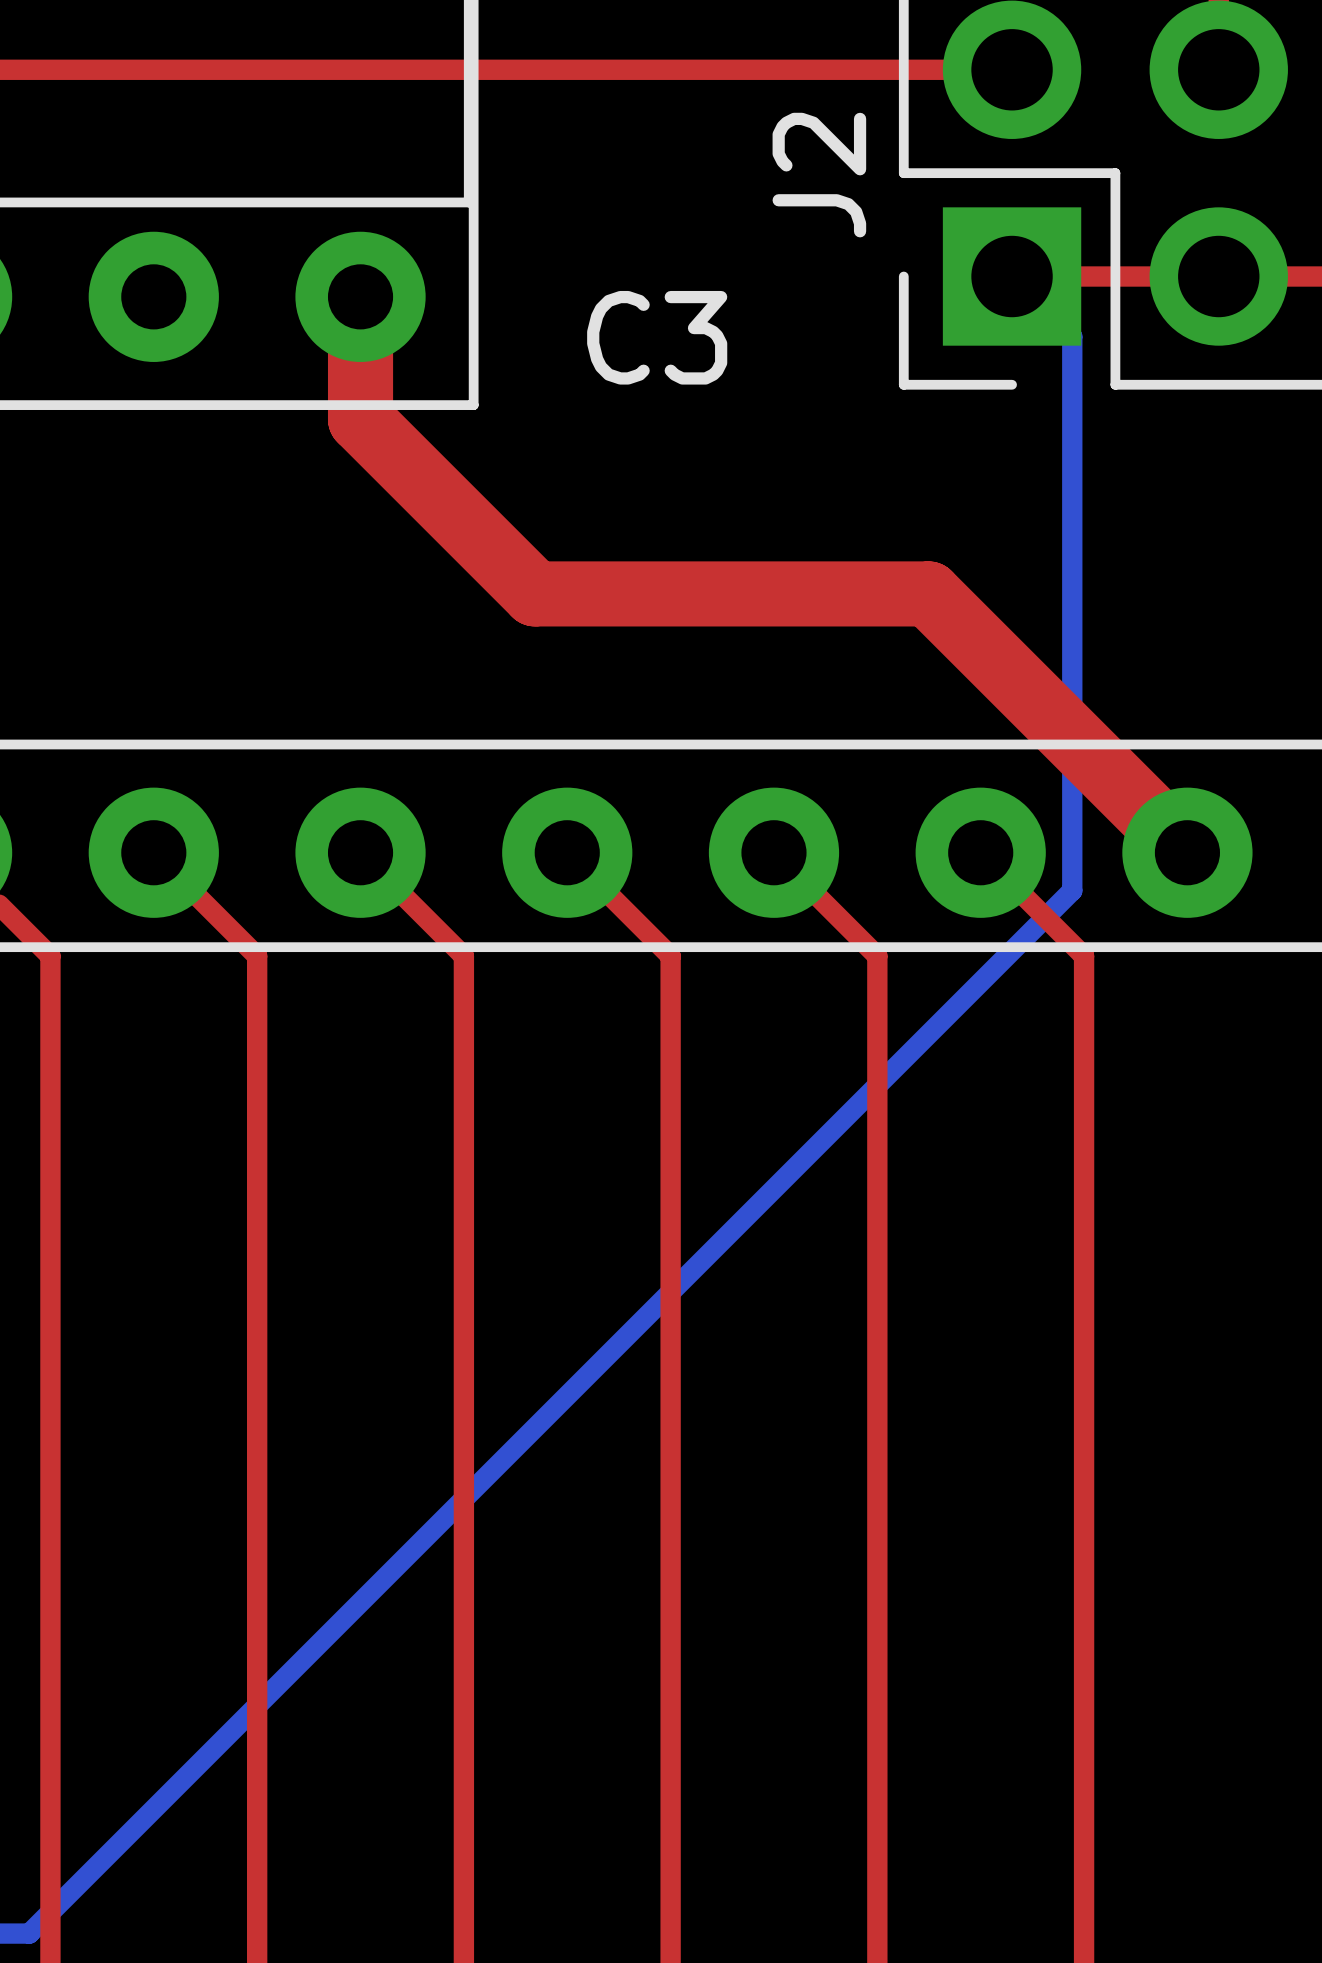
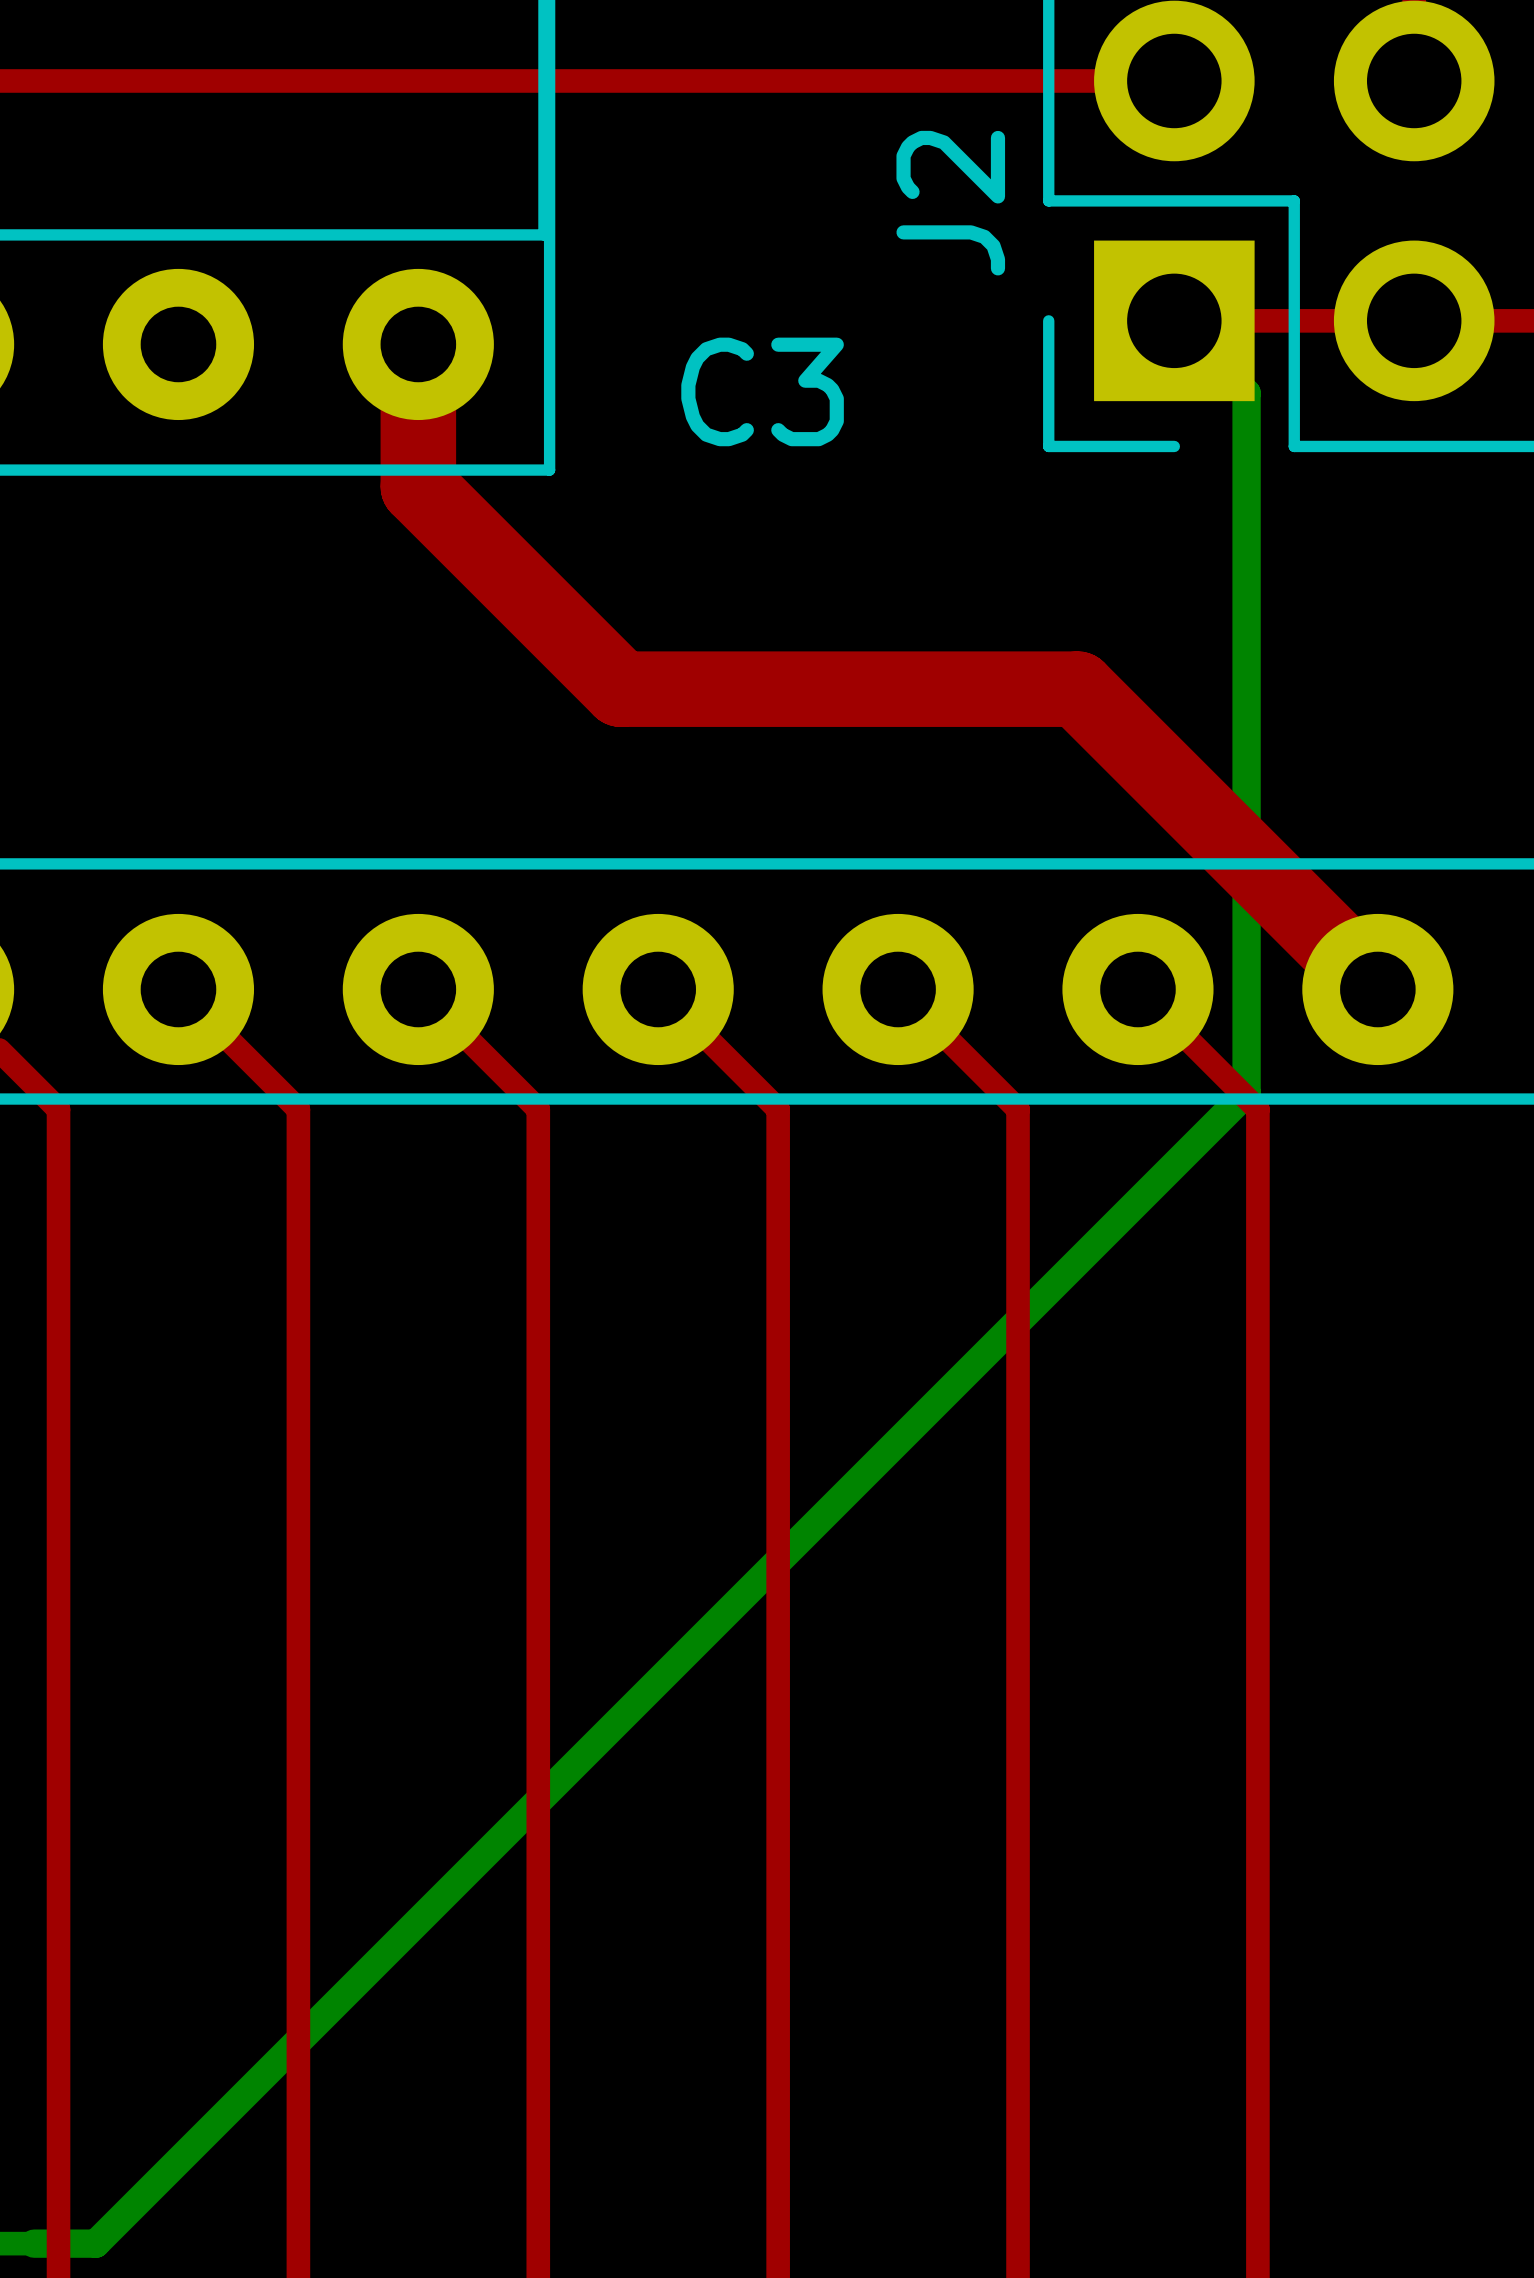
bottom track: (1072, 336) (1072, 890) (29, 1933) -> (1244, 390) (1246, 393) (1246, 1092) (95, 2243) (34, 2243)

